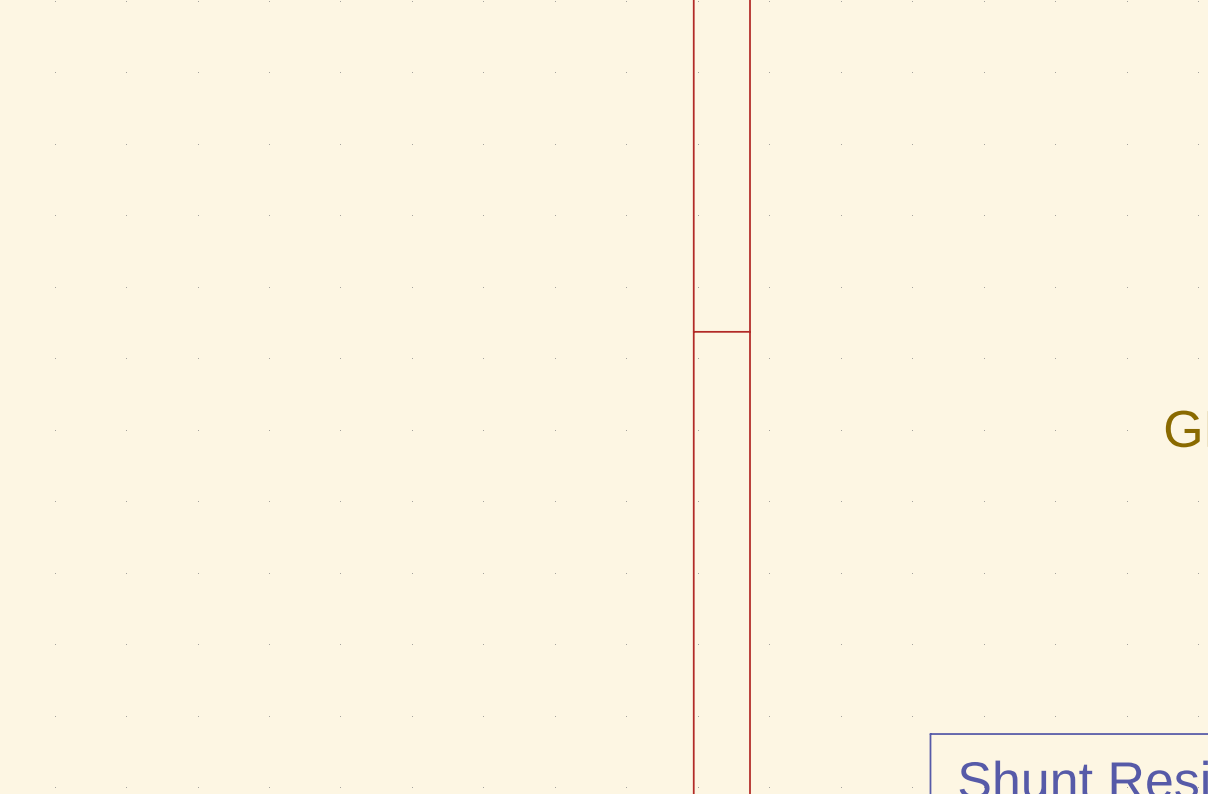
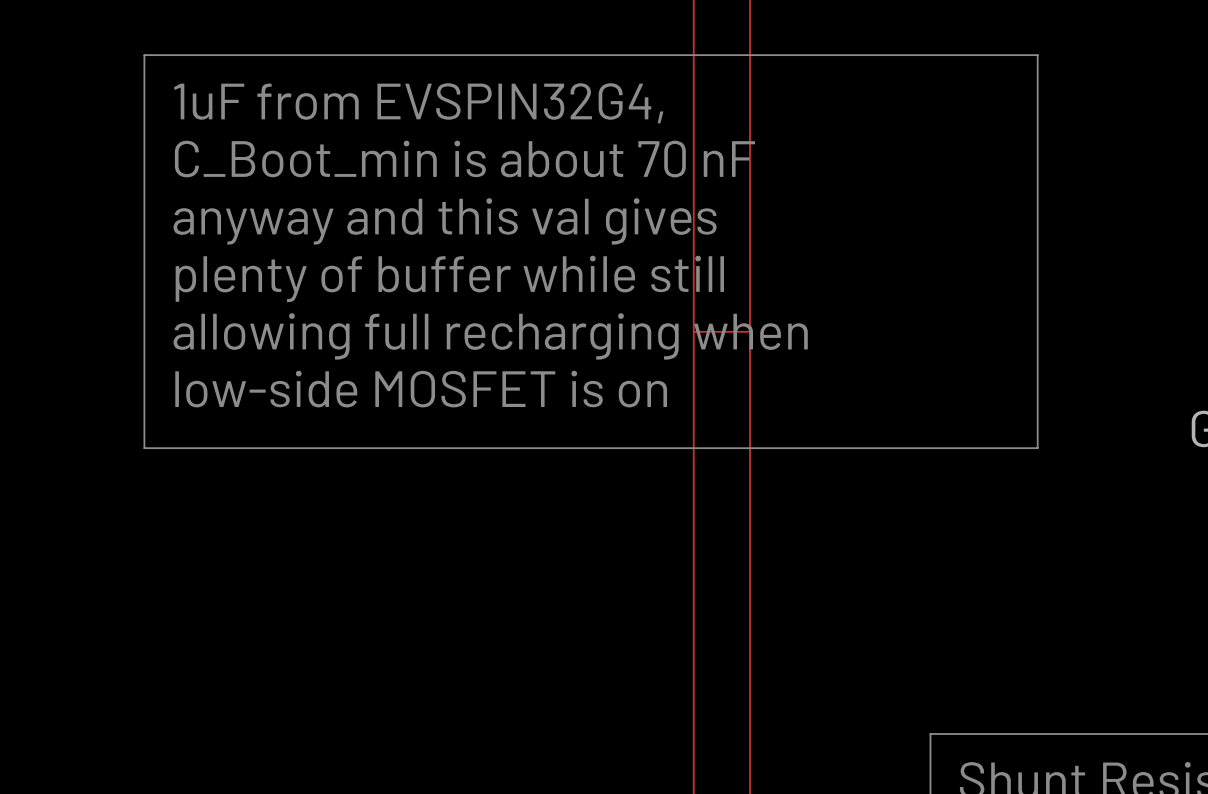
line: none -> (144, 55) (1037, 55) (1037, 448) (144, 448) (144, 55)
text: none -> 1uF from EVSPIN32G4, (418, 103)
text: none -> C_Boot_min is about 70 nF (464, 159)
text: none -> anyway and this val gives (445, 221)
text: none -> plenty of buffer while still (449, 278)
text: none -> allowing full recharging when (490, 336)
text: none -> low-side MOSFET is on (421, 389)

